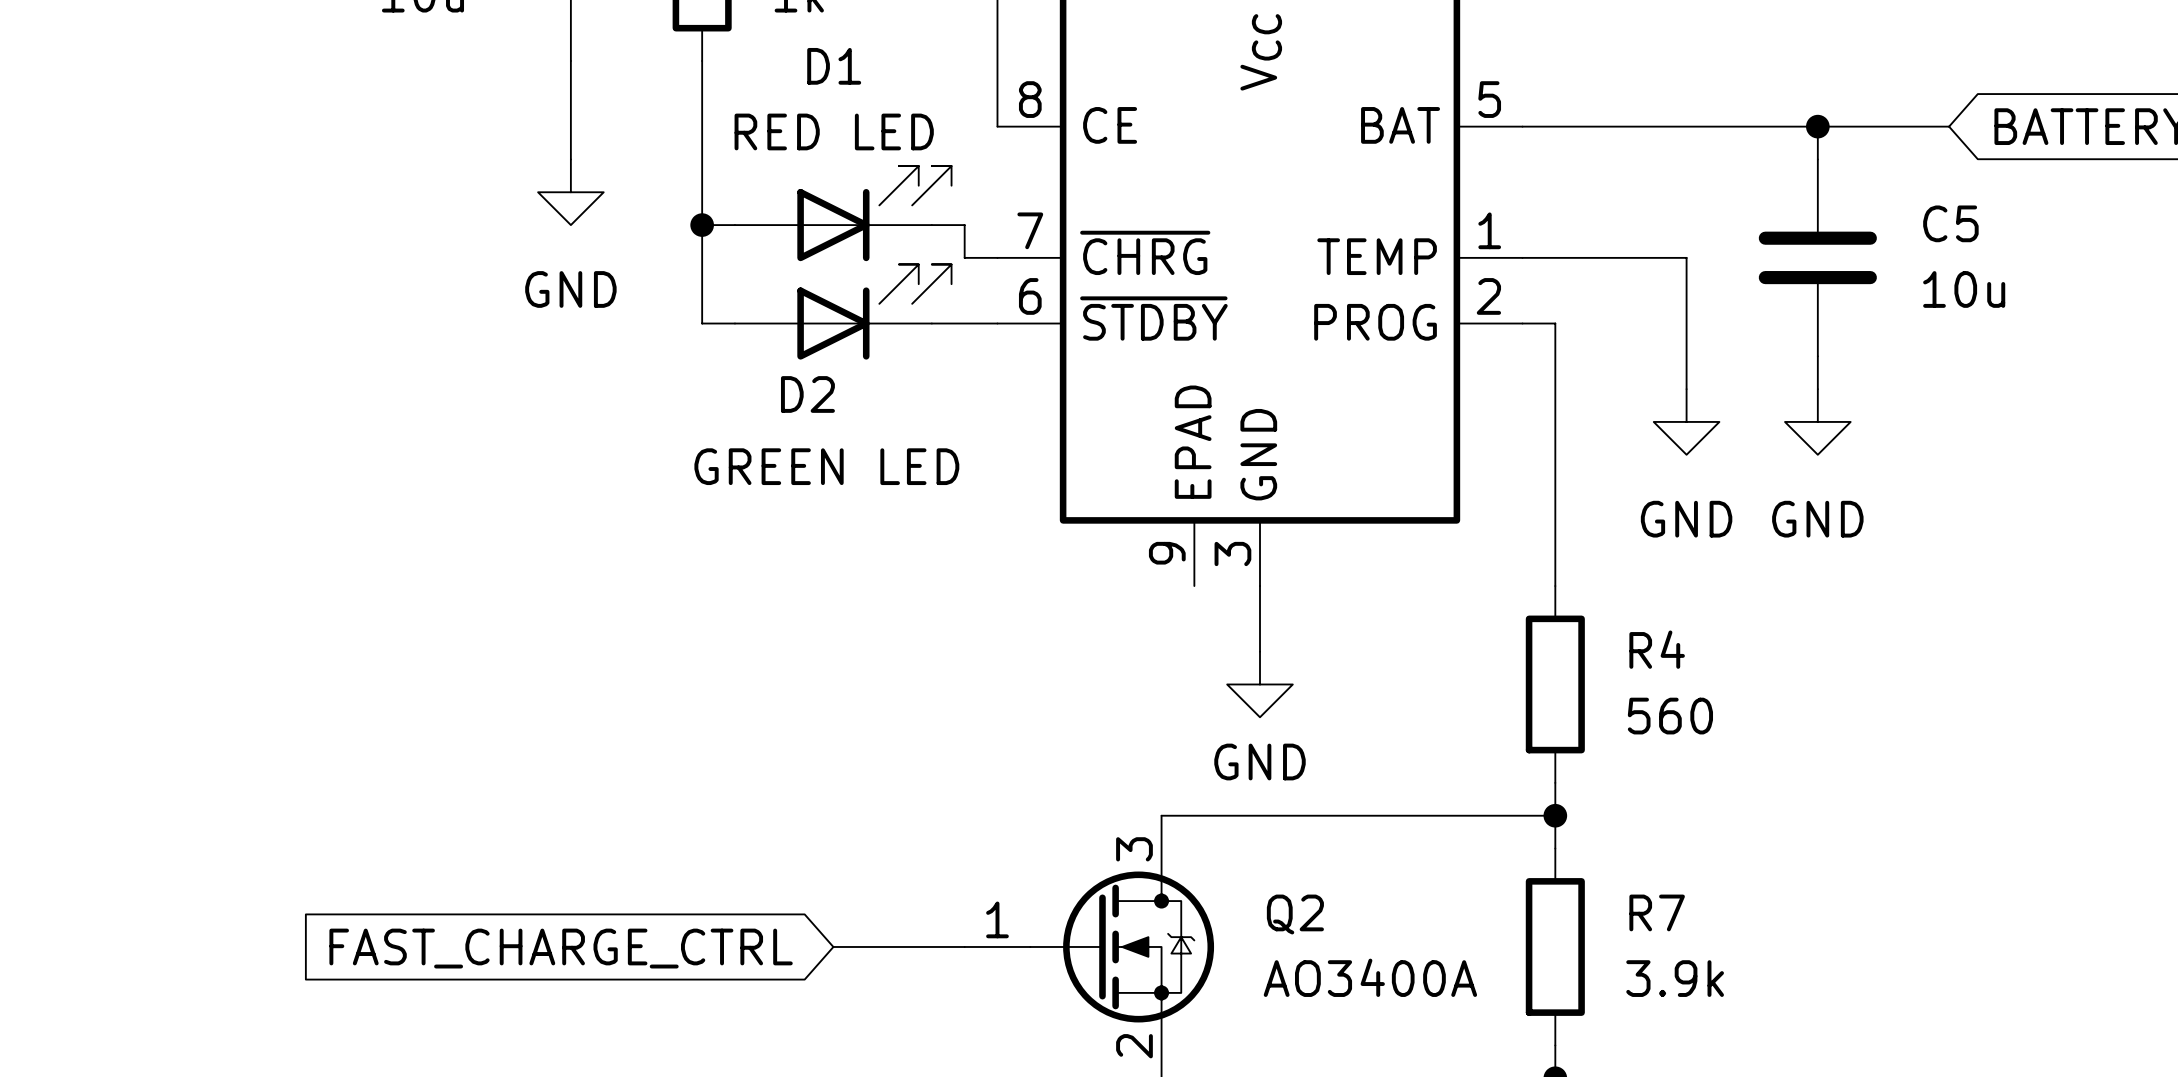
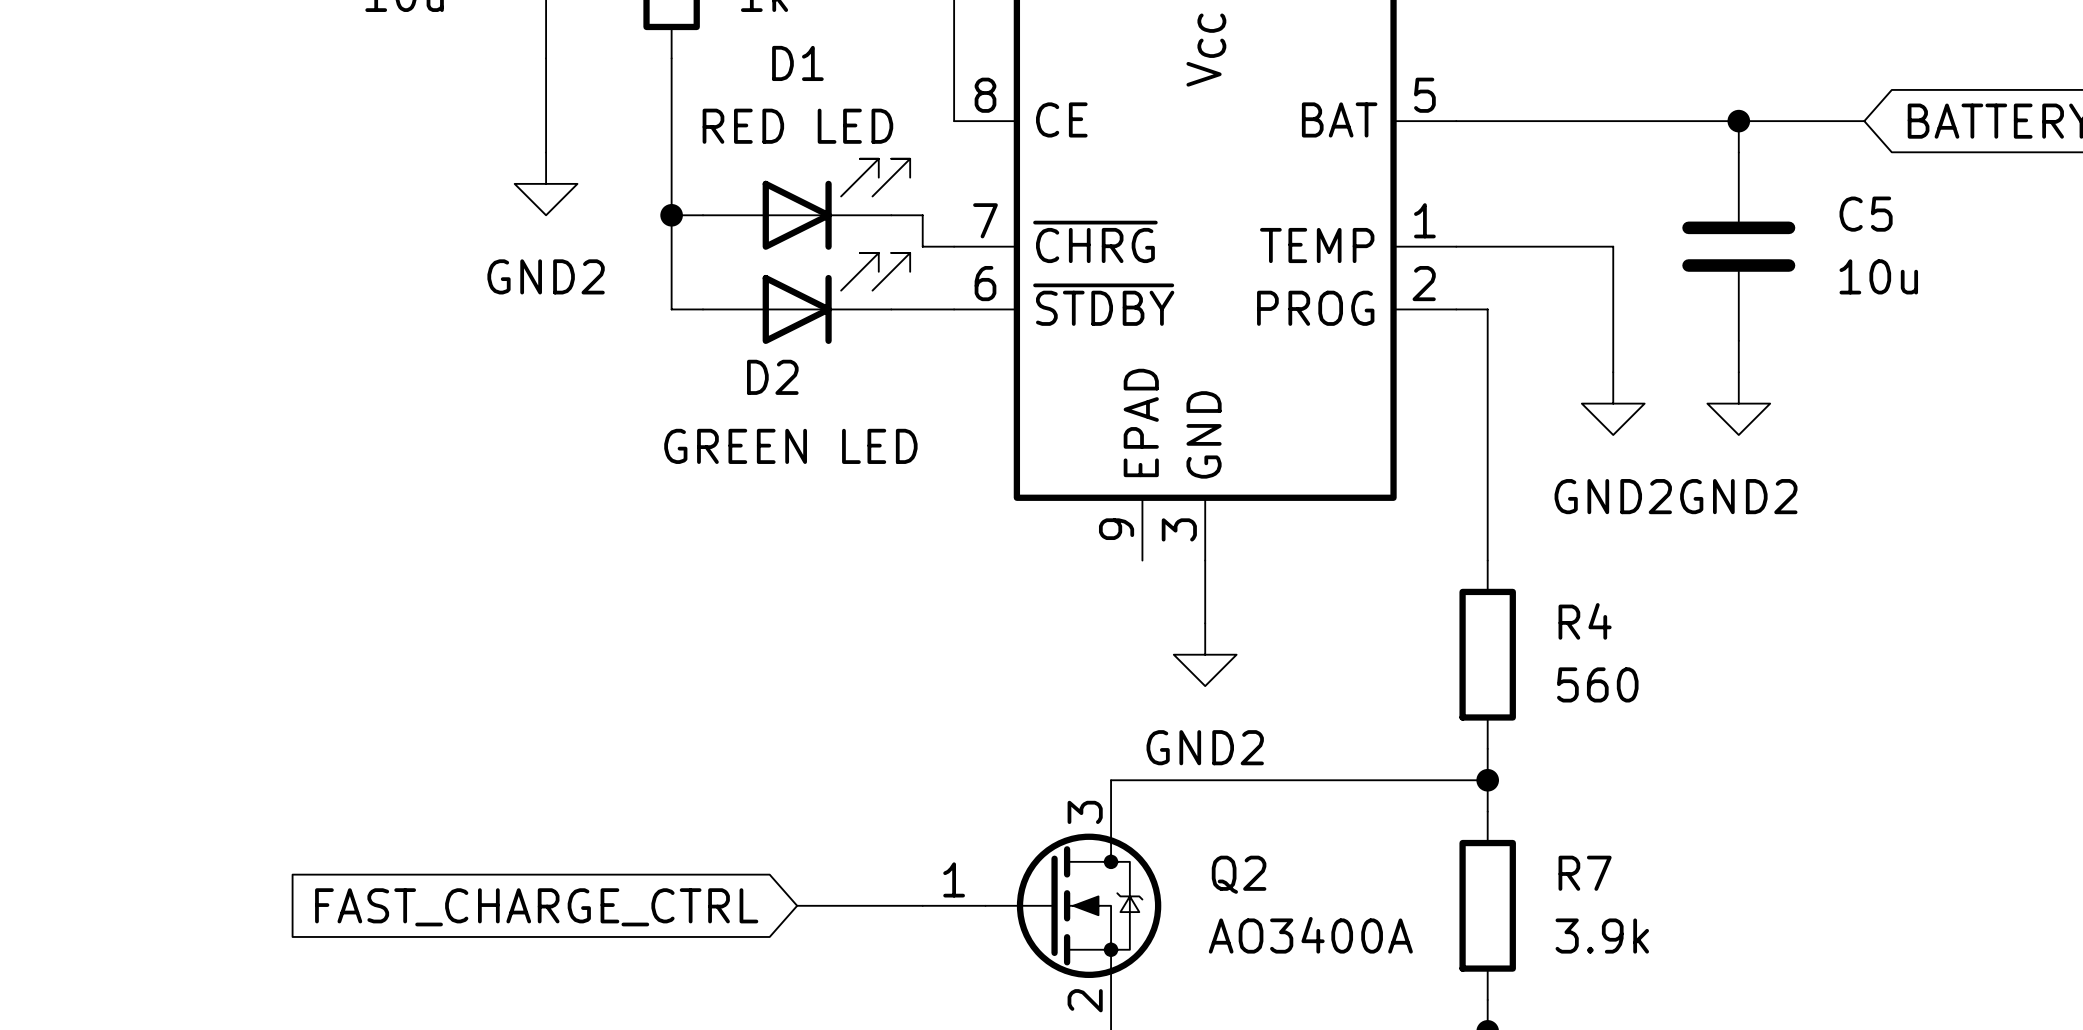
power symbol: GND (570, 192) -> GND2 (546, 183)
power symbol: GND (1686, 421) -> GND2 (1613, 403)
power symbol: GND (1817, 421) -> GND2 (1738, 403)
power symbol: GND (1260, 684) -> GND2 (1205, 654)

